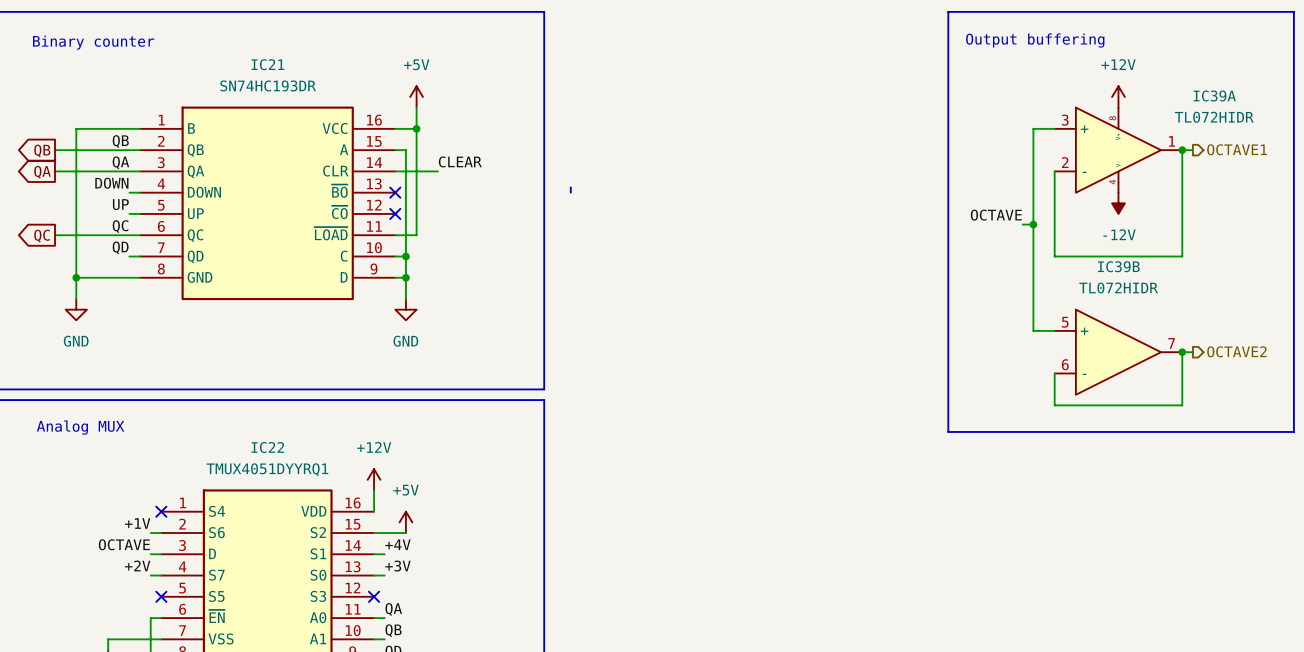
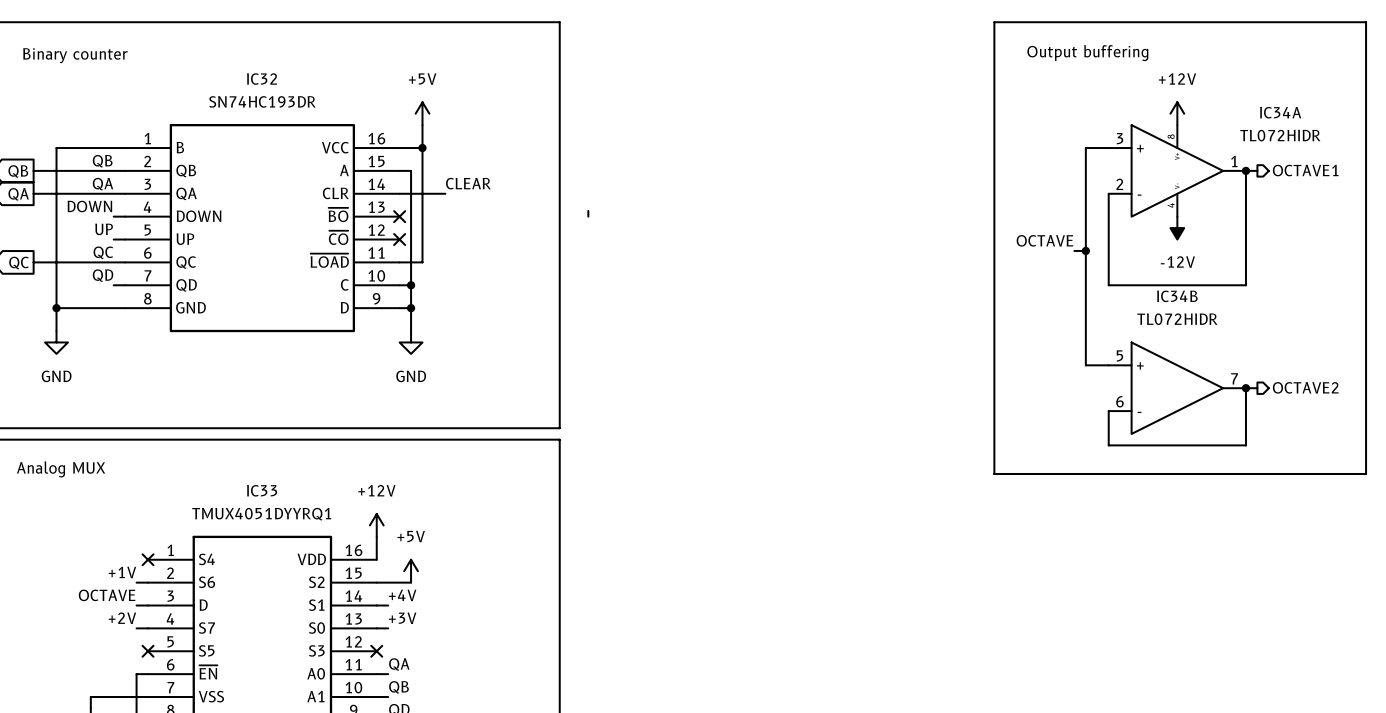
IC21 name: IC21 (267, 64) -> IC32 (262, 79)
IC39A name: IC39A (1214, 96) -> IC34A (1280, 112)
IC39B name: IC39B (1118, 266) -> IC34B (1177, 296)
IC22 name: IC22 (267, 447) -> IC33 (262, 490)

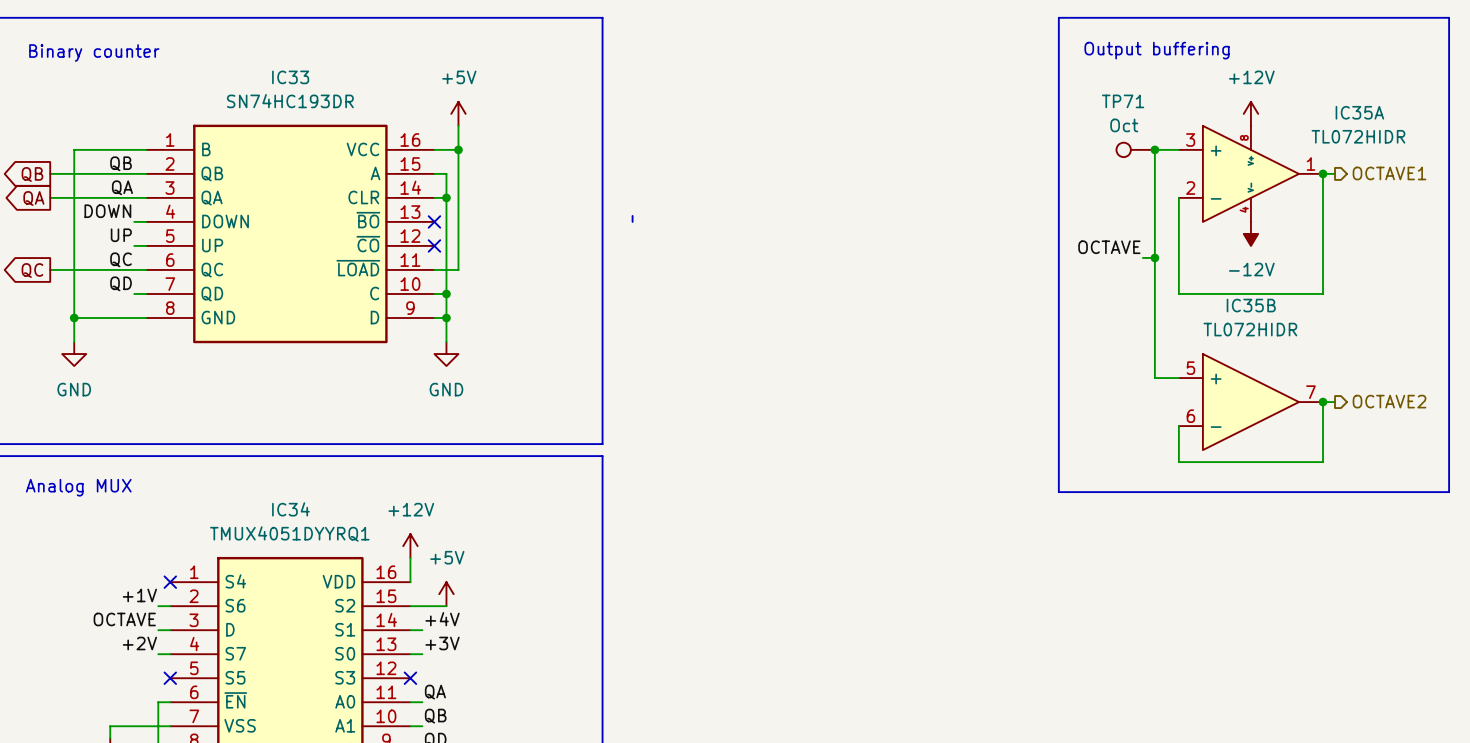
IC32 name: IC32 (262, 79) -> IC33 (290, 77)
IC34A name: IC34A (1280, 112) -> IC35A (1359, 112)
TP71: none -> Oct (1135, 149)
junction: none -> (1154, 149)
label: CLEAR (468, 183) -> none
wire: (411, 193) (445, 193) -> none
junction: none -> (446, 197)
IC34B name: IC34B (1177, 296) -> IC35B (1251, 305)
IC33 name: IC33 (262, 490) -> IC34 (290, 509)

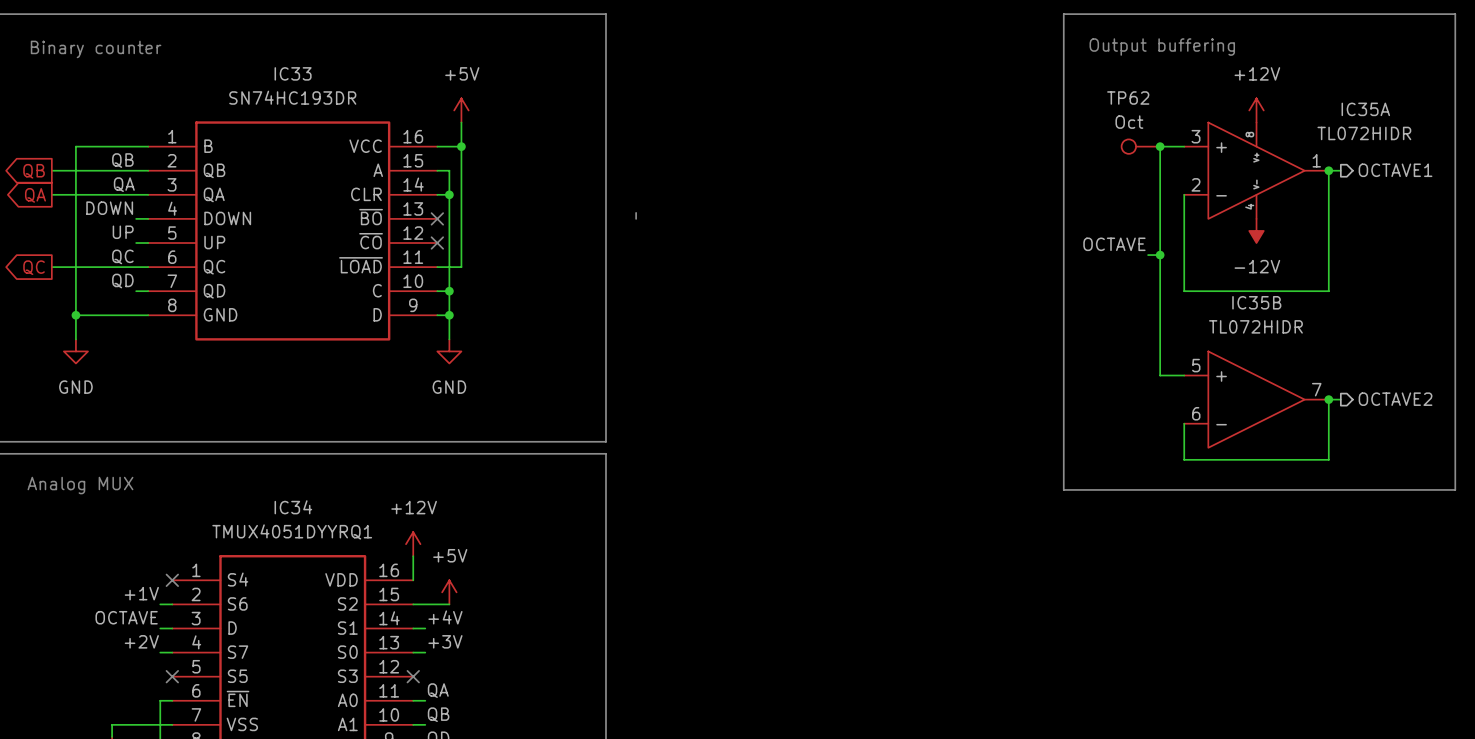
TP71 name: TP71 (1123, 101) -> TP62 (1128, 97)

